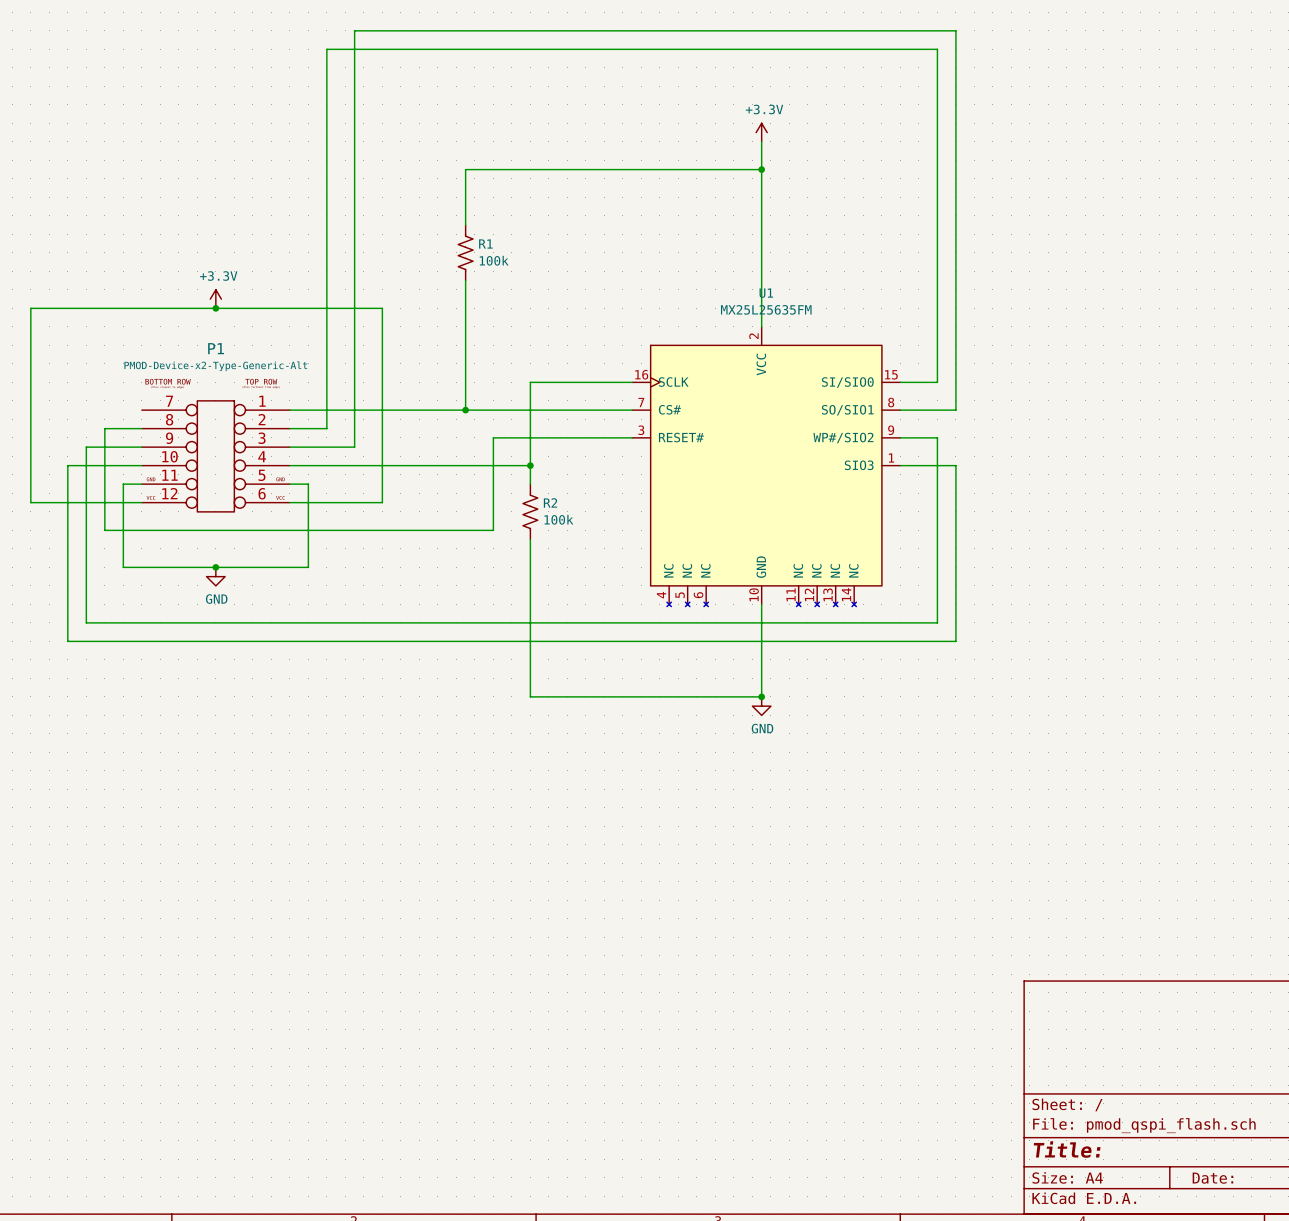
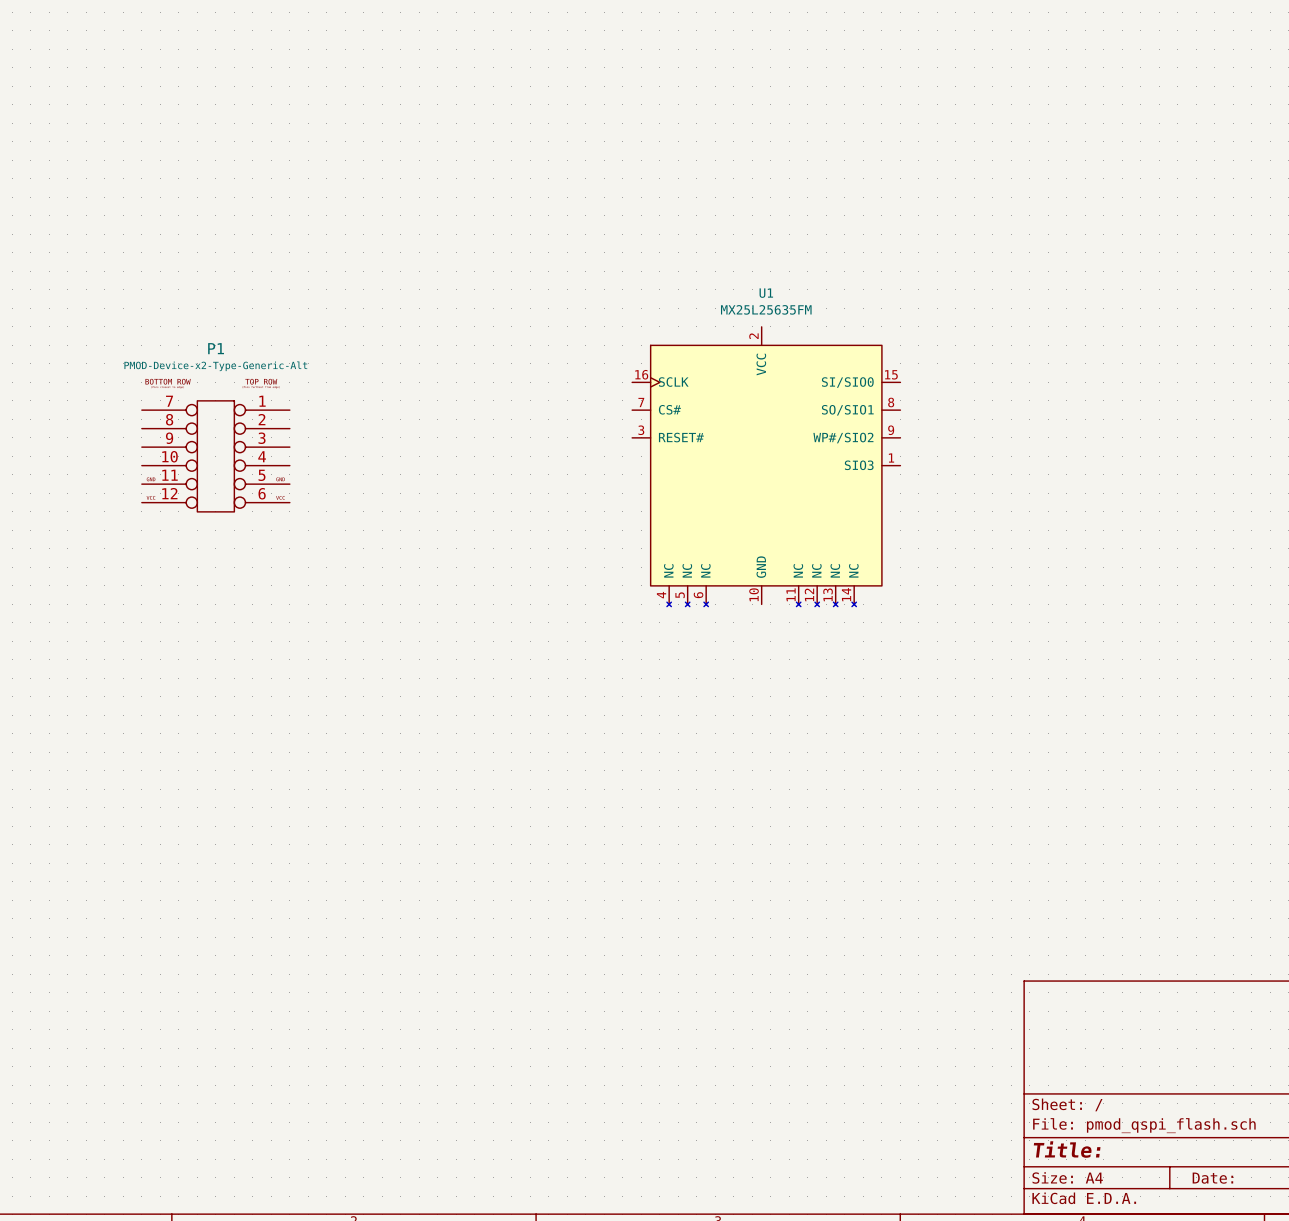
power symbol: +3.3V (761, 132) -> none
wire: (761, 141) (761, 326) -> none
wire: (761, 169) (465, 169) (465, 225) -> none
junction: (761, 169) -> none
R1: 100k (465, 252) -> none
wire: (465, 280) (465, 410) -> none
power symbol: +3.3V (215, 299) -> none
junction: (215, 308) -> none
wire: (632, 382) (530, 382) (530, 484) -> none
wire: (900, 382) (937, 382) (937, 49) (326, 49) (326, 428) (289, 428) -> none
wire: (289, 410) (632, 410) -> none
junction: (465, 410) -> none
wire: (900, 410) (955, 410) (955, 30) (354, 30) (354, 447) (289, 447) -> none
wire: (141, 428) (104, 428) (104, 530) (493, 530) (493, 437) (632, 437) -> none
wire: (900, 437) (937, 437) (937, 622) (86, 622) (86, 447) (141, 447) -> none
wire: (141, 465) (67, 465) (67, 641) (955, 641) (955, 465) (900, 465) -> none
wire: (289, 465) (530, 465) -> none
junction: (530, 465) -> none
wire: (141, 484) (123, 484) (123, 567) (308, 567) (308, 484) (289, 484) -> none
wire: (141, 502) (30, 502) (30, 308) (382, 308) (382, 502) (289, 502) -> none
R2: 100k (530, 511) -> none
wire: (530, 539) (530, 696) (761, 696) (761, 604) -> none
junction: (215, 567) -> none
power symbol: GND (215, 576) -> none
junction: (761, 696) -> none
power symbol: GND (761, 706) -> none

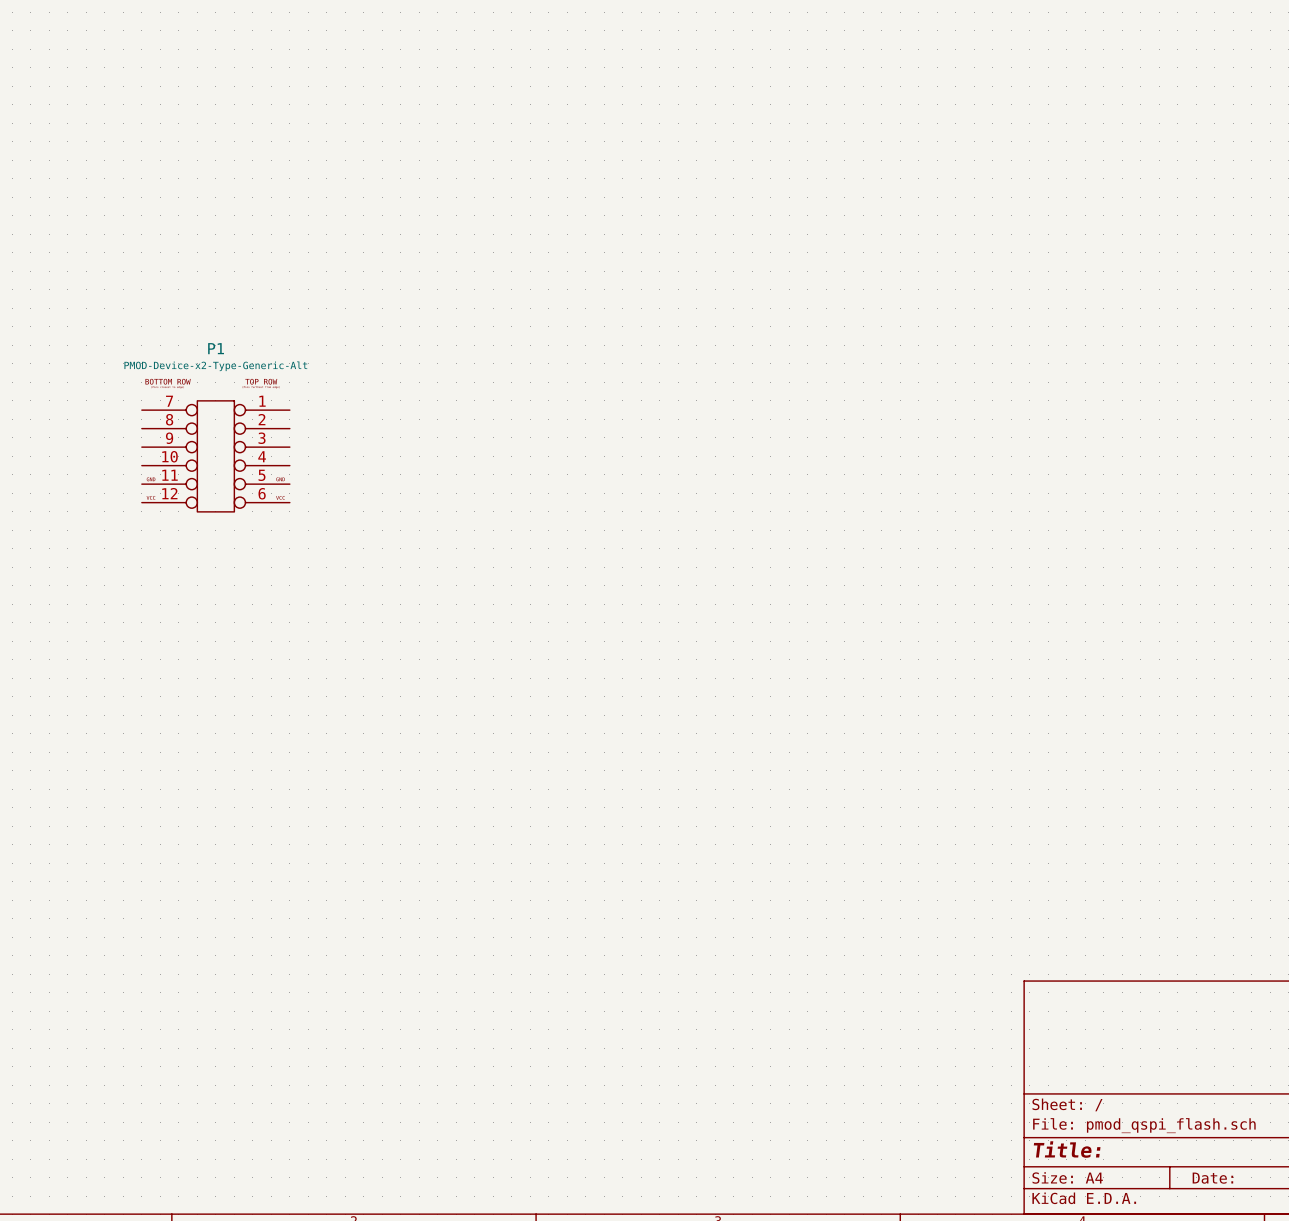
U1: MX25L25635FM (766, 466) -> none

